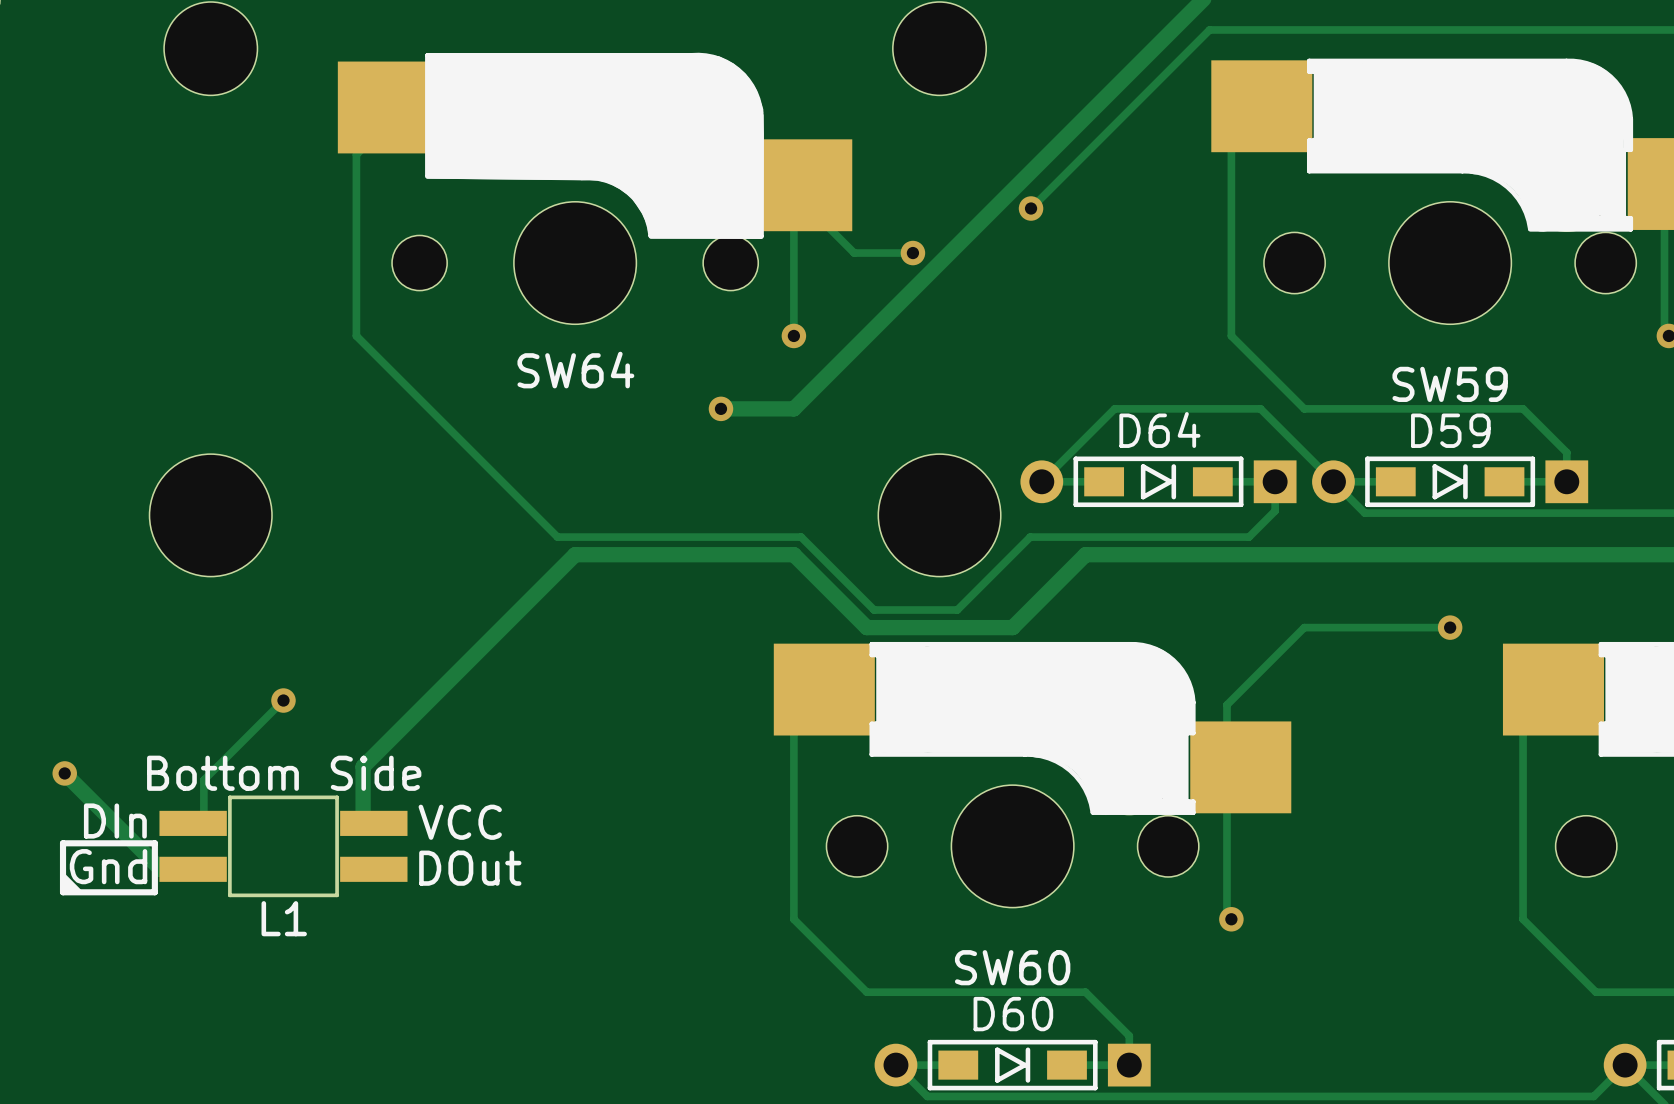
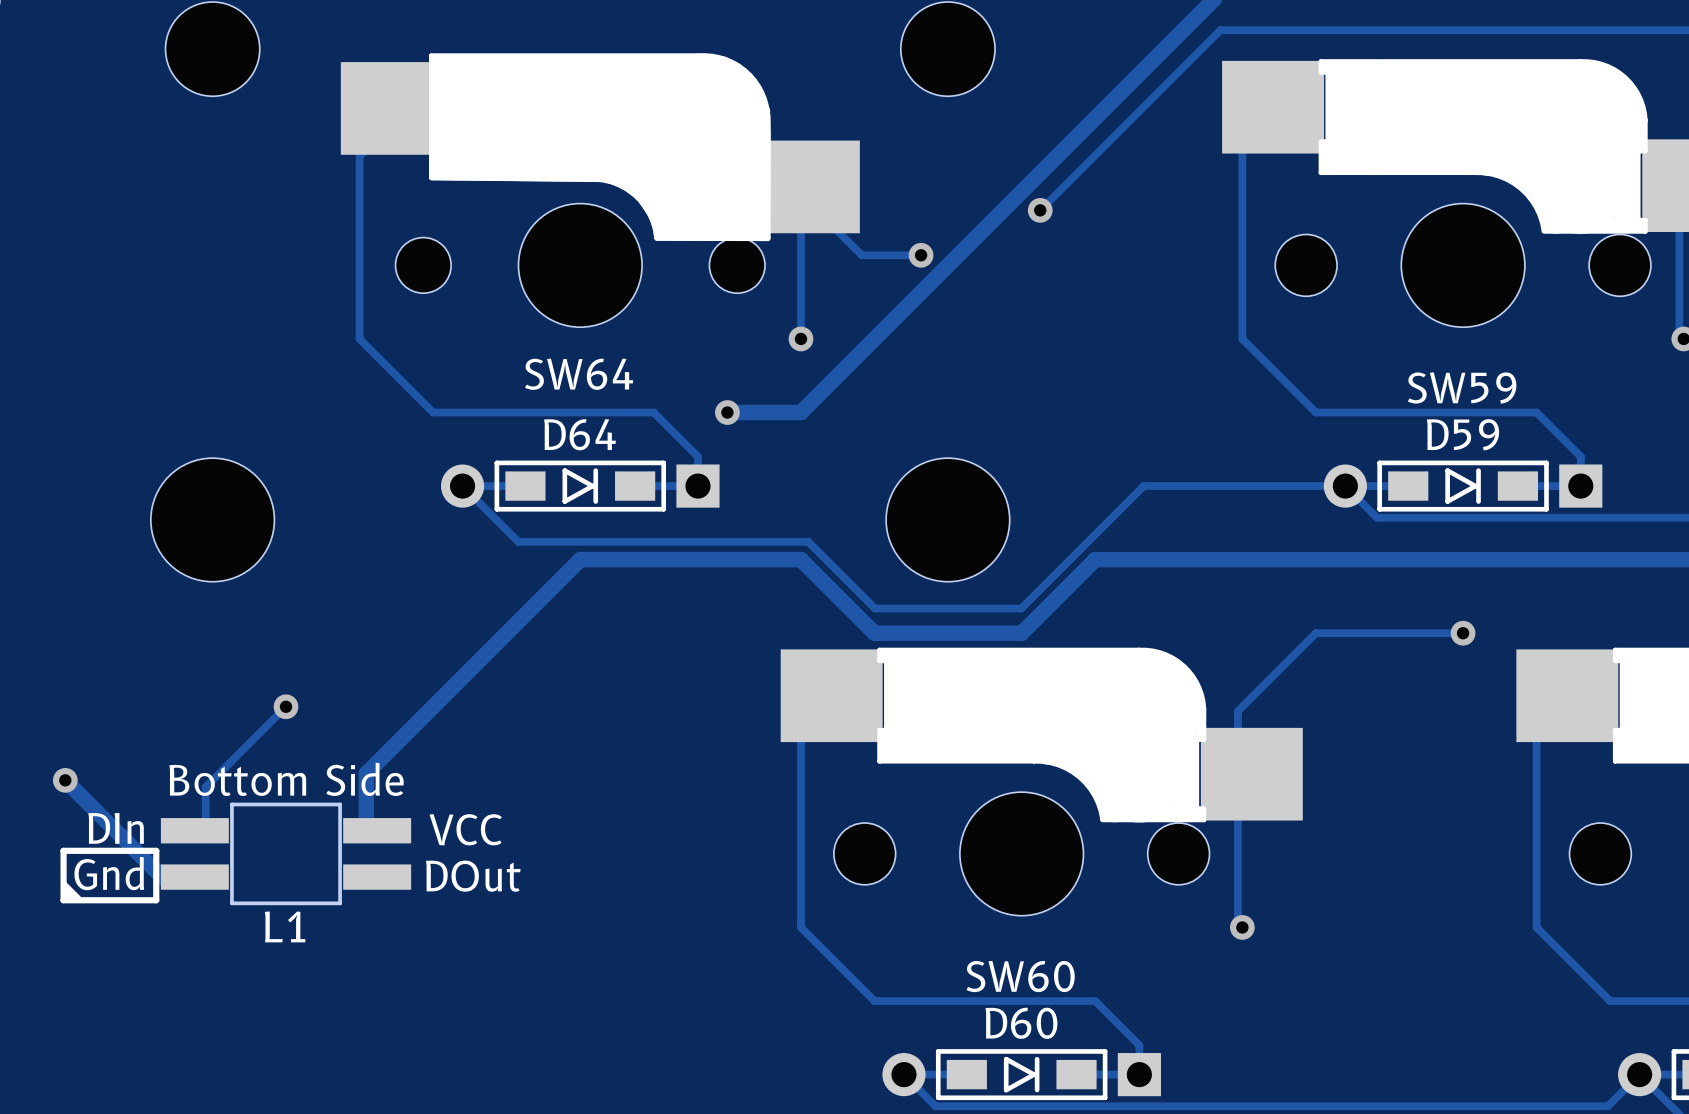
track: (429, 408) (557, 537) -> (433, 412) (653, 412) (697, 456) (697, 486) (635, 486)
track: none -> (525, 486) (462, 486) (518, 541) (562, 541)
D64 position: (1158, 481) -> (580, 486)
track: (1275, 481) (1275, 510) (1248, 537) (1030, 537) (957, 610) (874, 610) (867, 603) -> (1223, 486) (1143, 486) (1021, 608) (874, 608)
track: (1333, 481) (1260, 408) (1114, 408) (1041, 481) (1104, 481) -> (1345, 486) (1286, 486)

